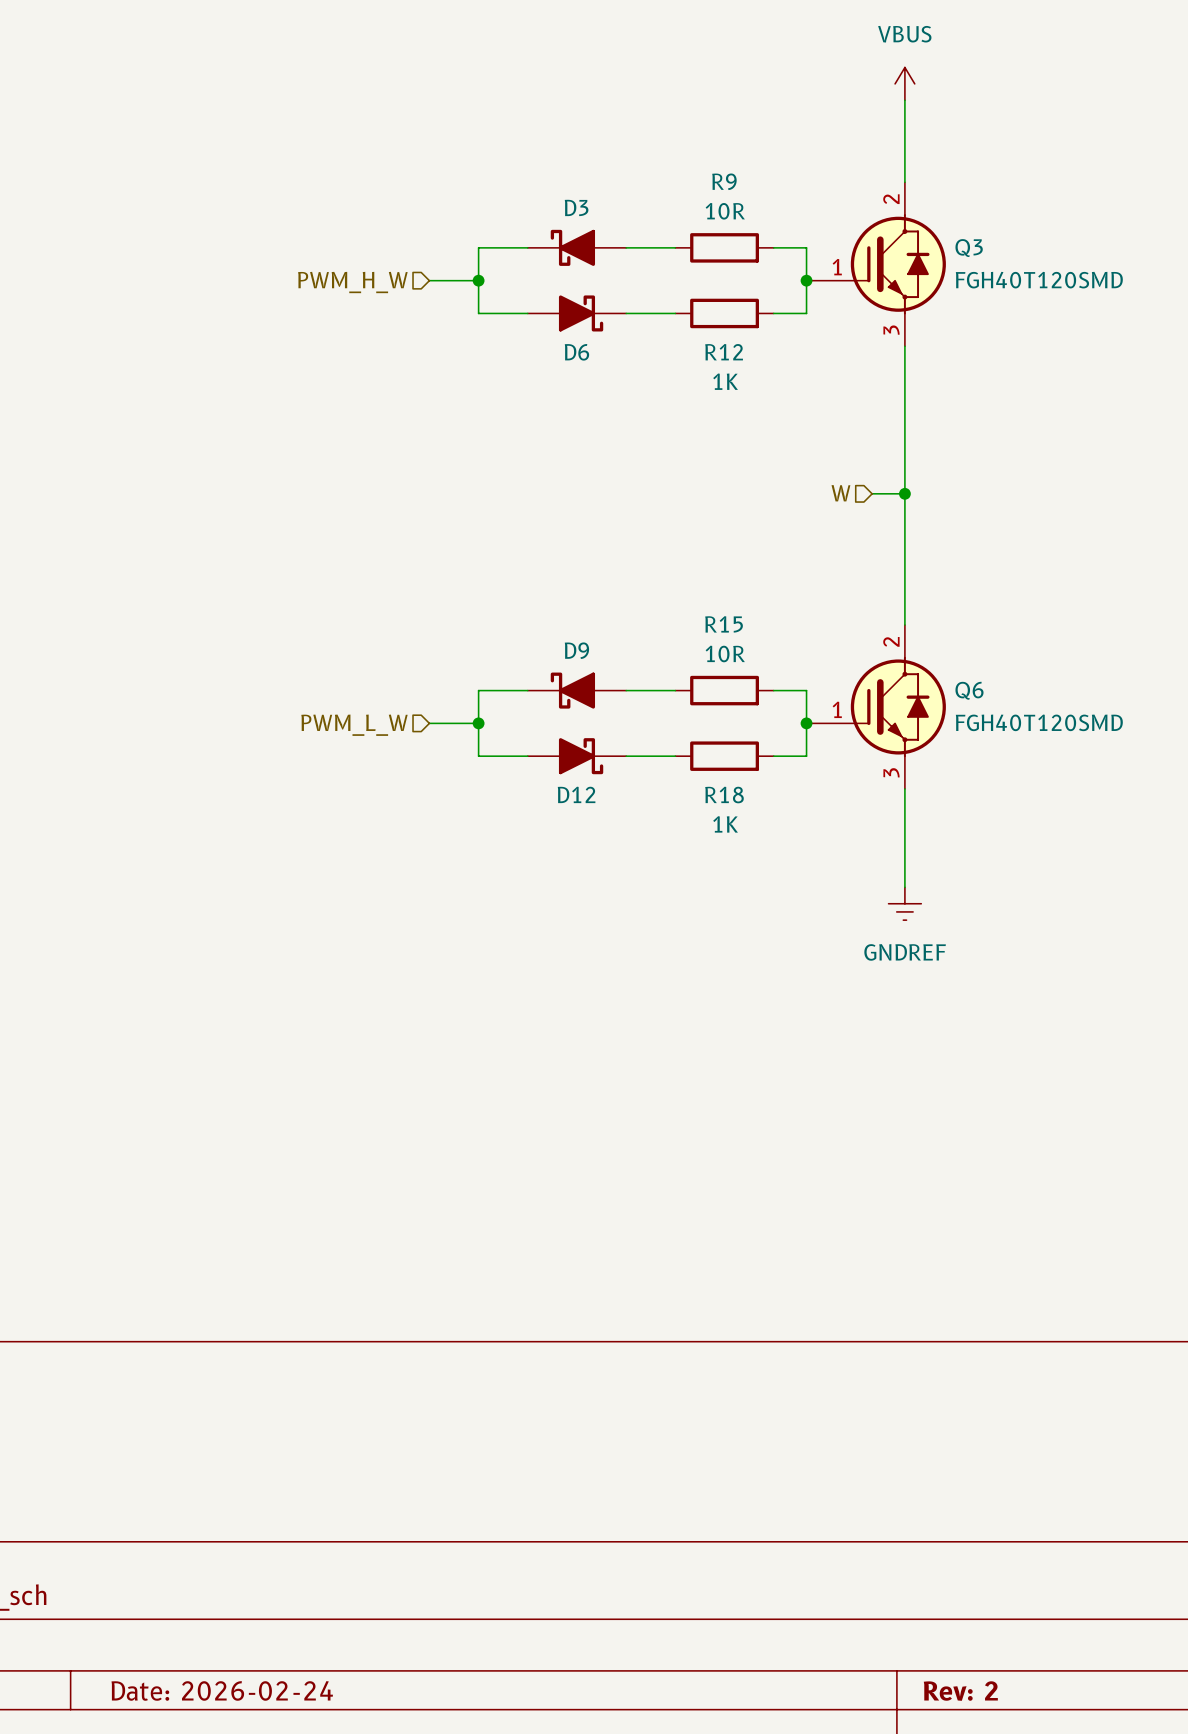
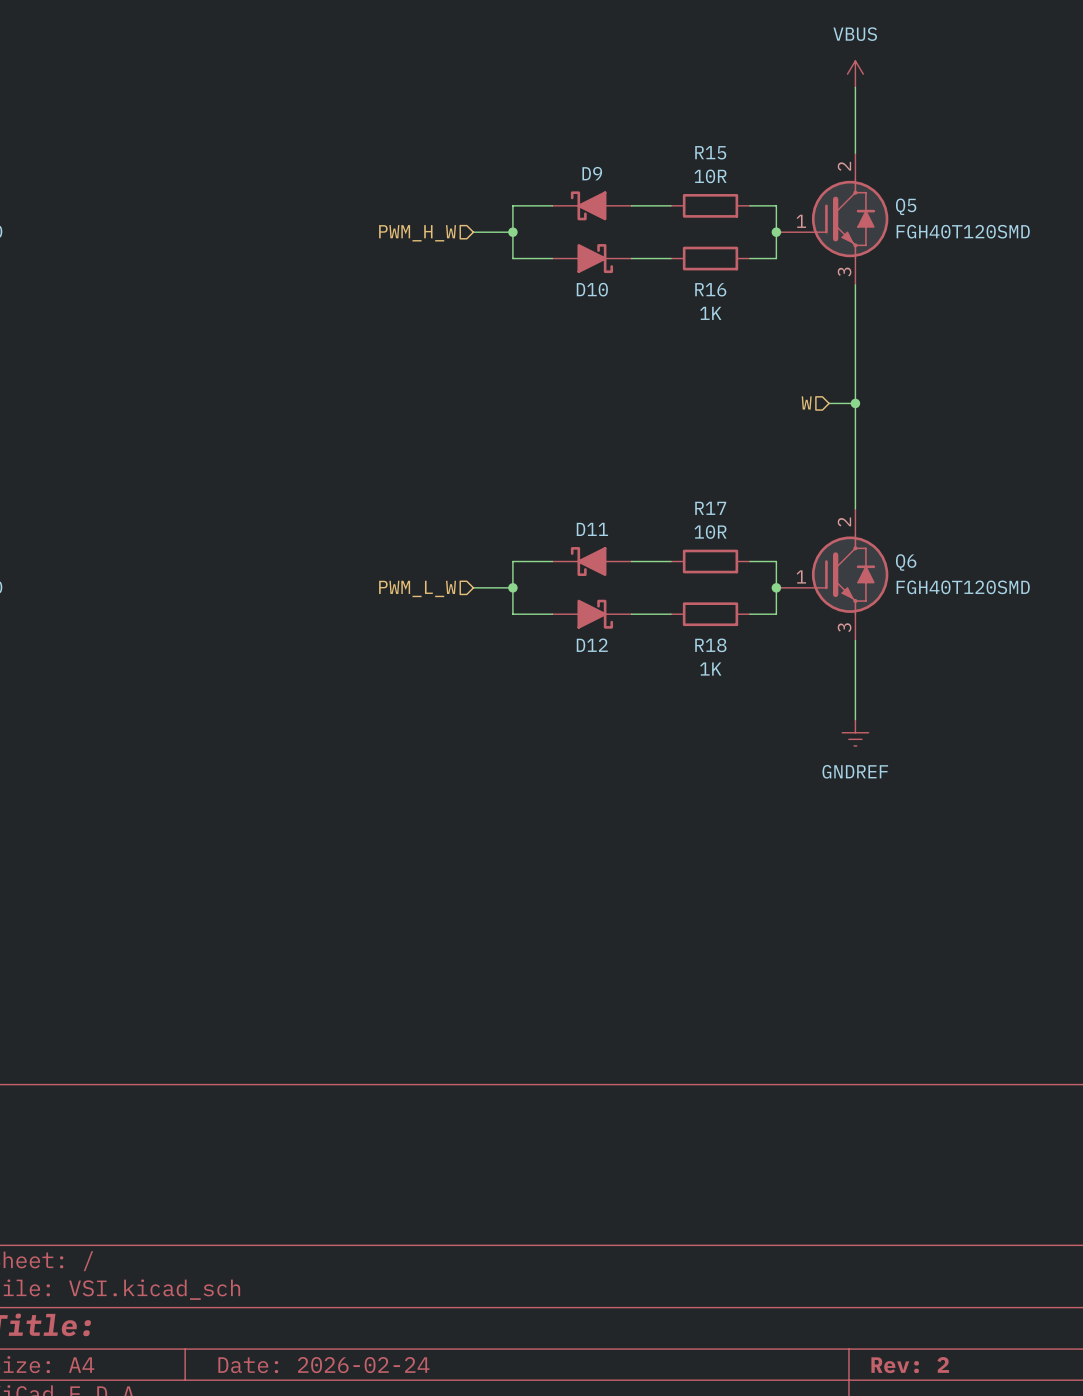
R9 name: R9 (724, 181) -> R15 (710, 152)
D3 name: D3 (576, 207) -> D9 (592, 173)
Q3 name: Q3 (969, 248) -> Q5 (906, 206)
D6 name: D6 (576, 352) -> D10 (592, 289)
R12 name: R12 (724, 352) -> R16 (710, 289)
R15 name: R15 (724, 624) -> R17 (710, 508)
D9 name: D9 (576, 650) -> D11 (592, 529)

